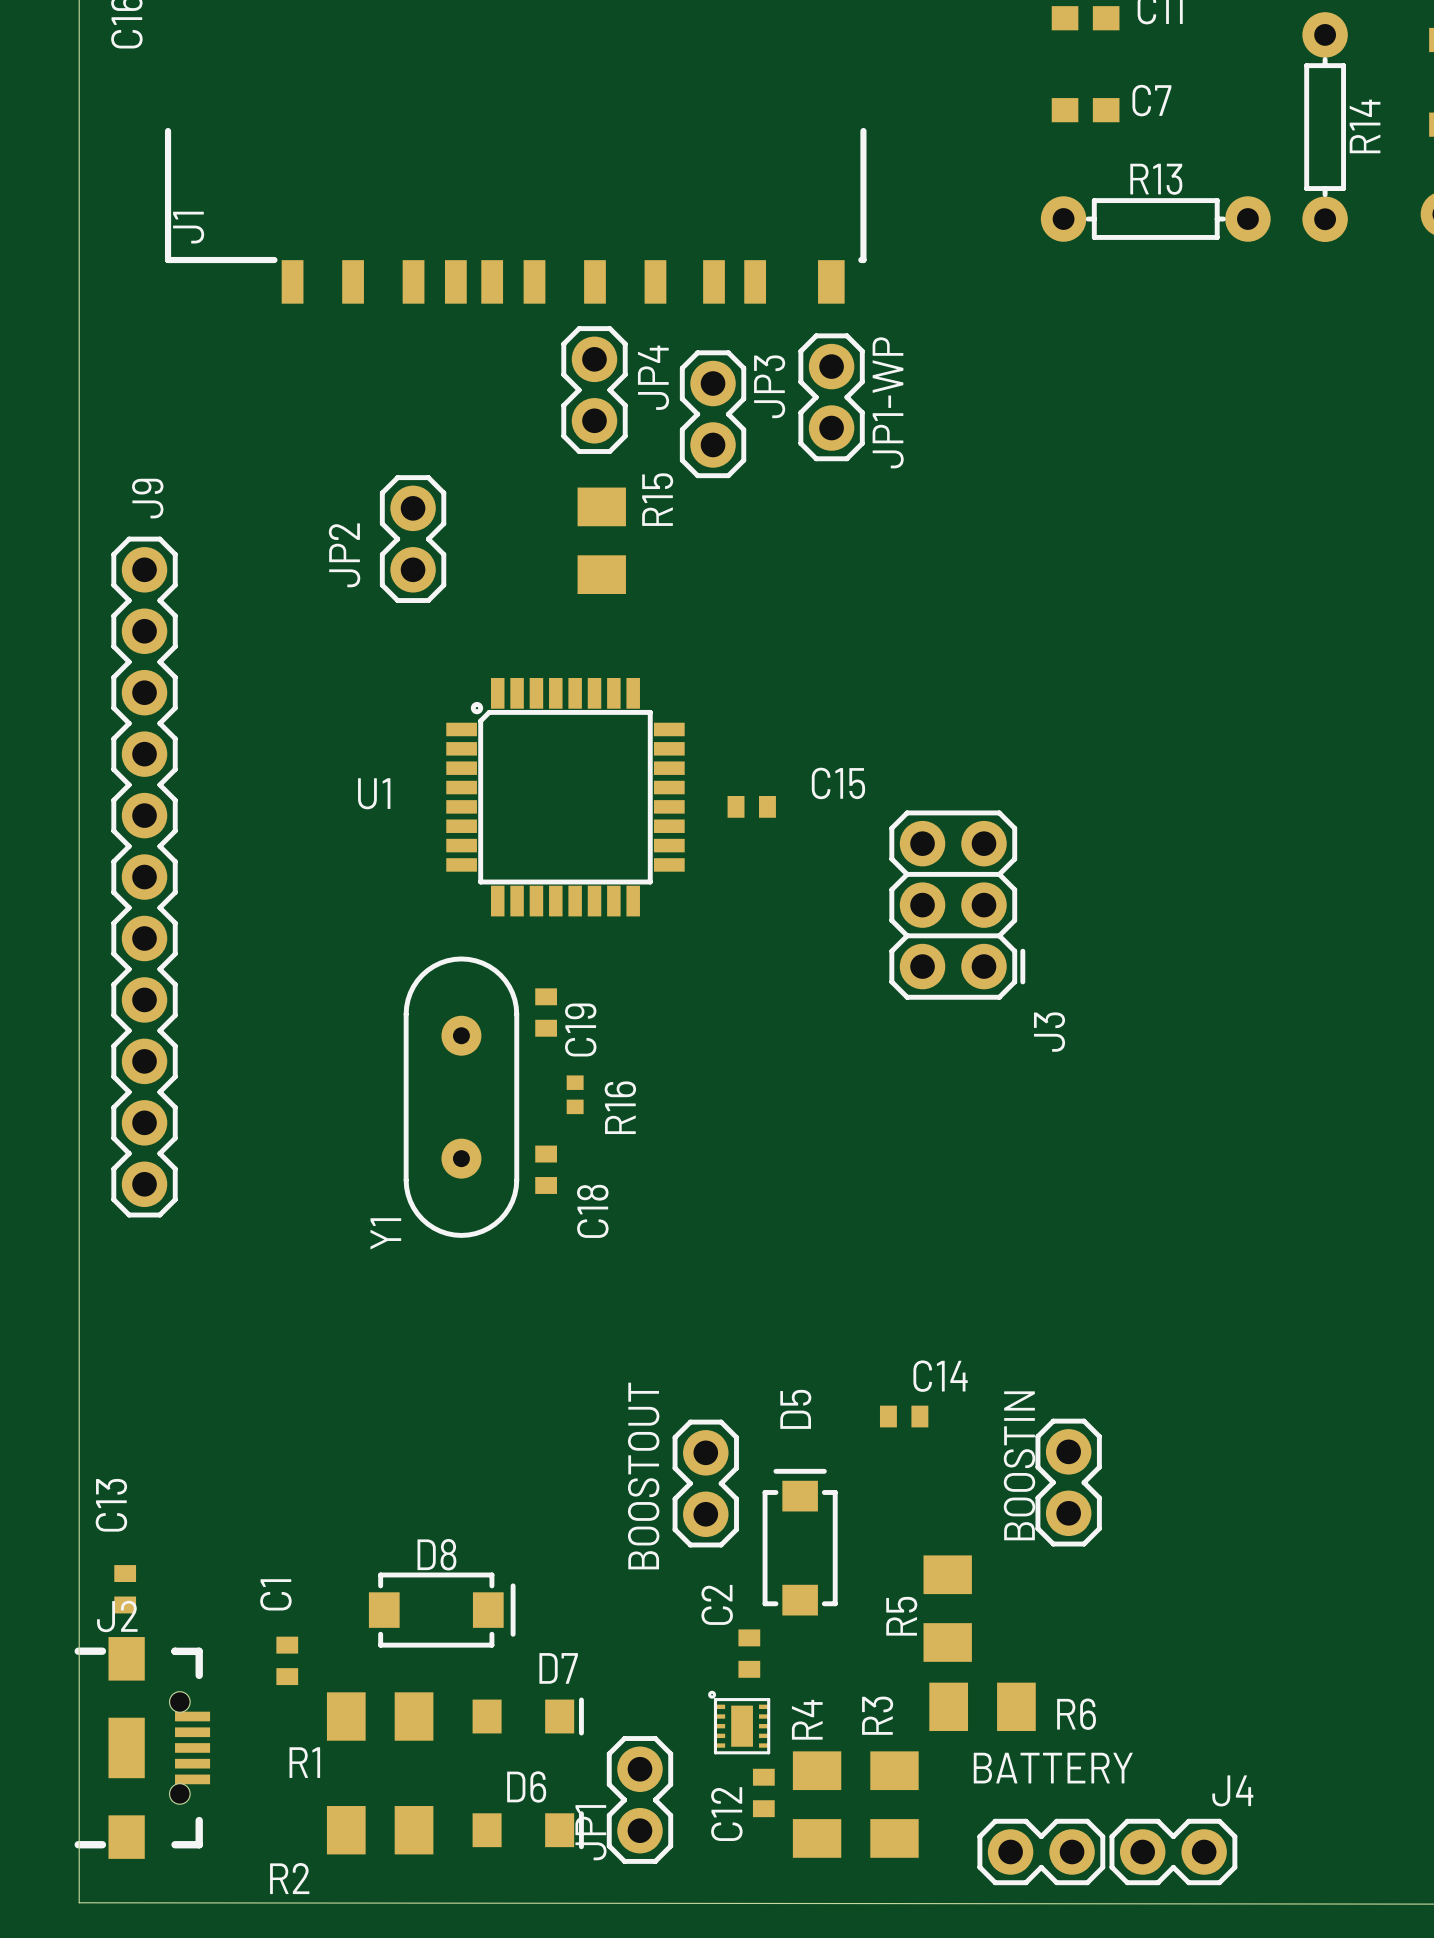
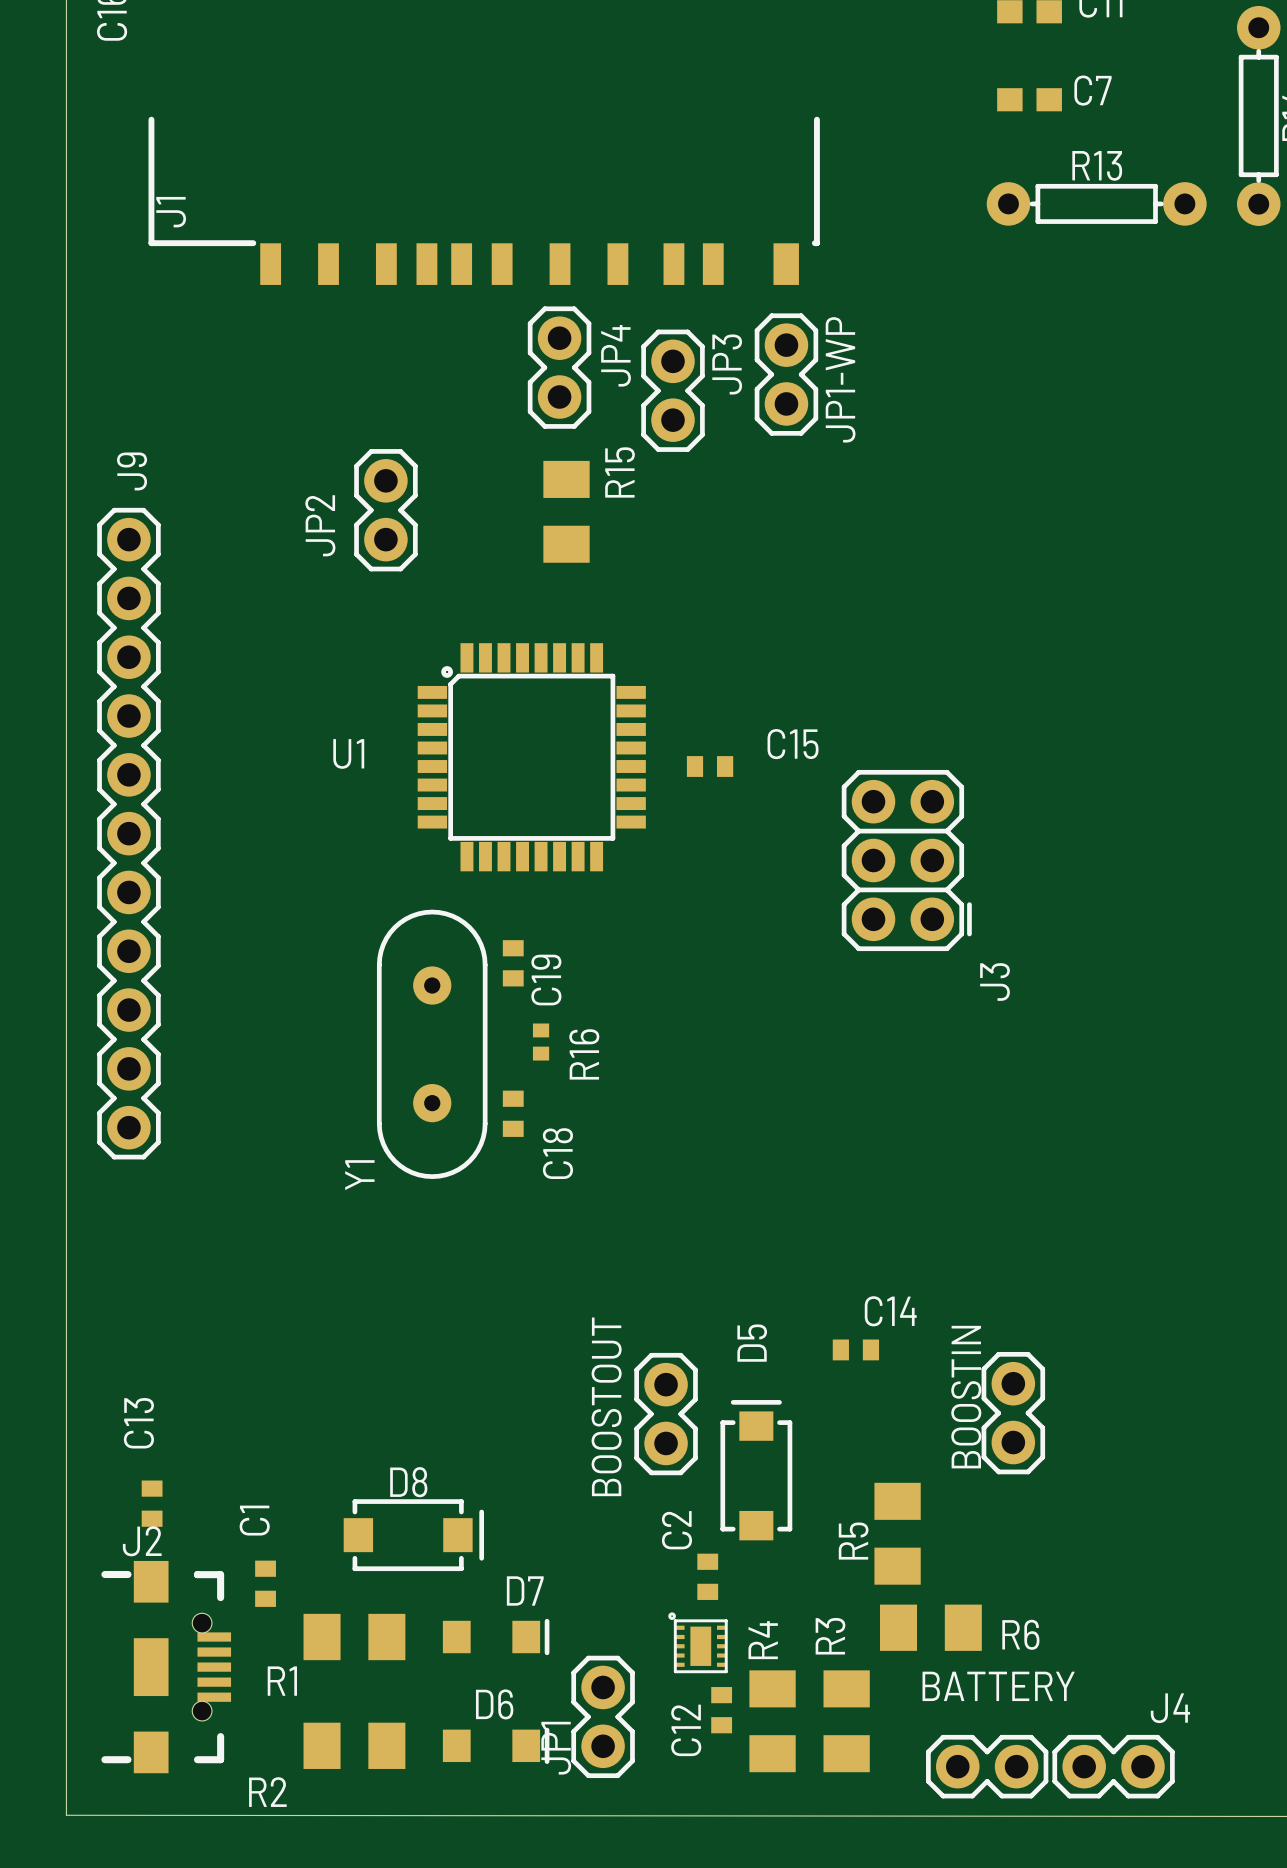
C13 position: (125, 1589) -> (152, 1503)
J2 position: (142, 1747) -> (166, 1667)

